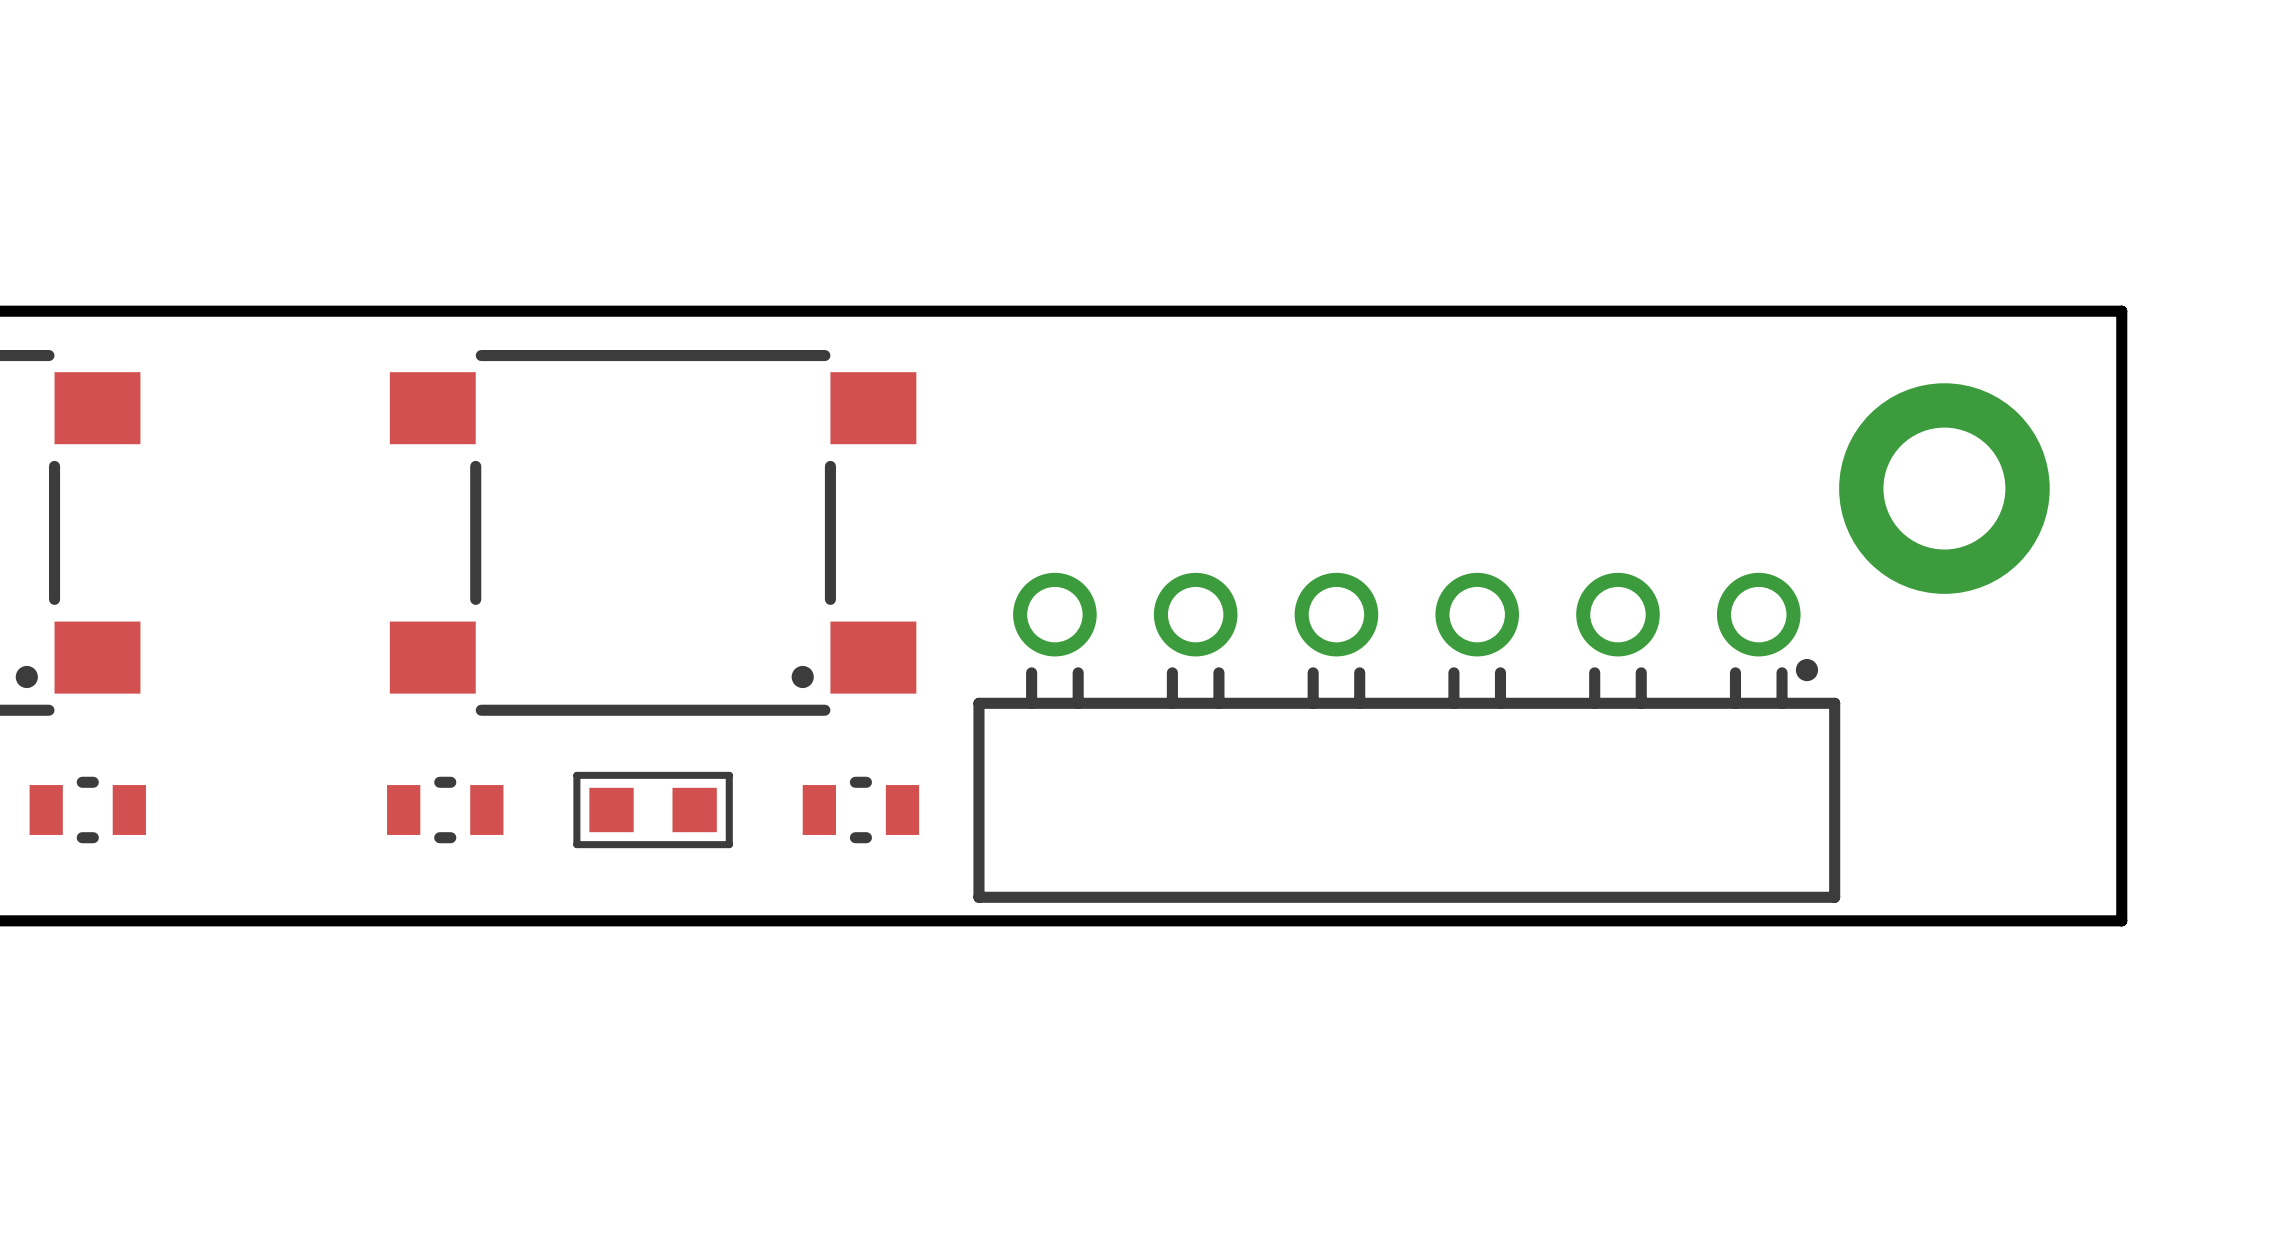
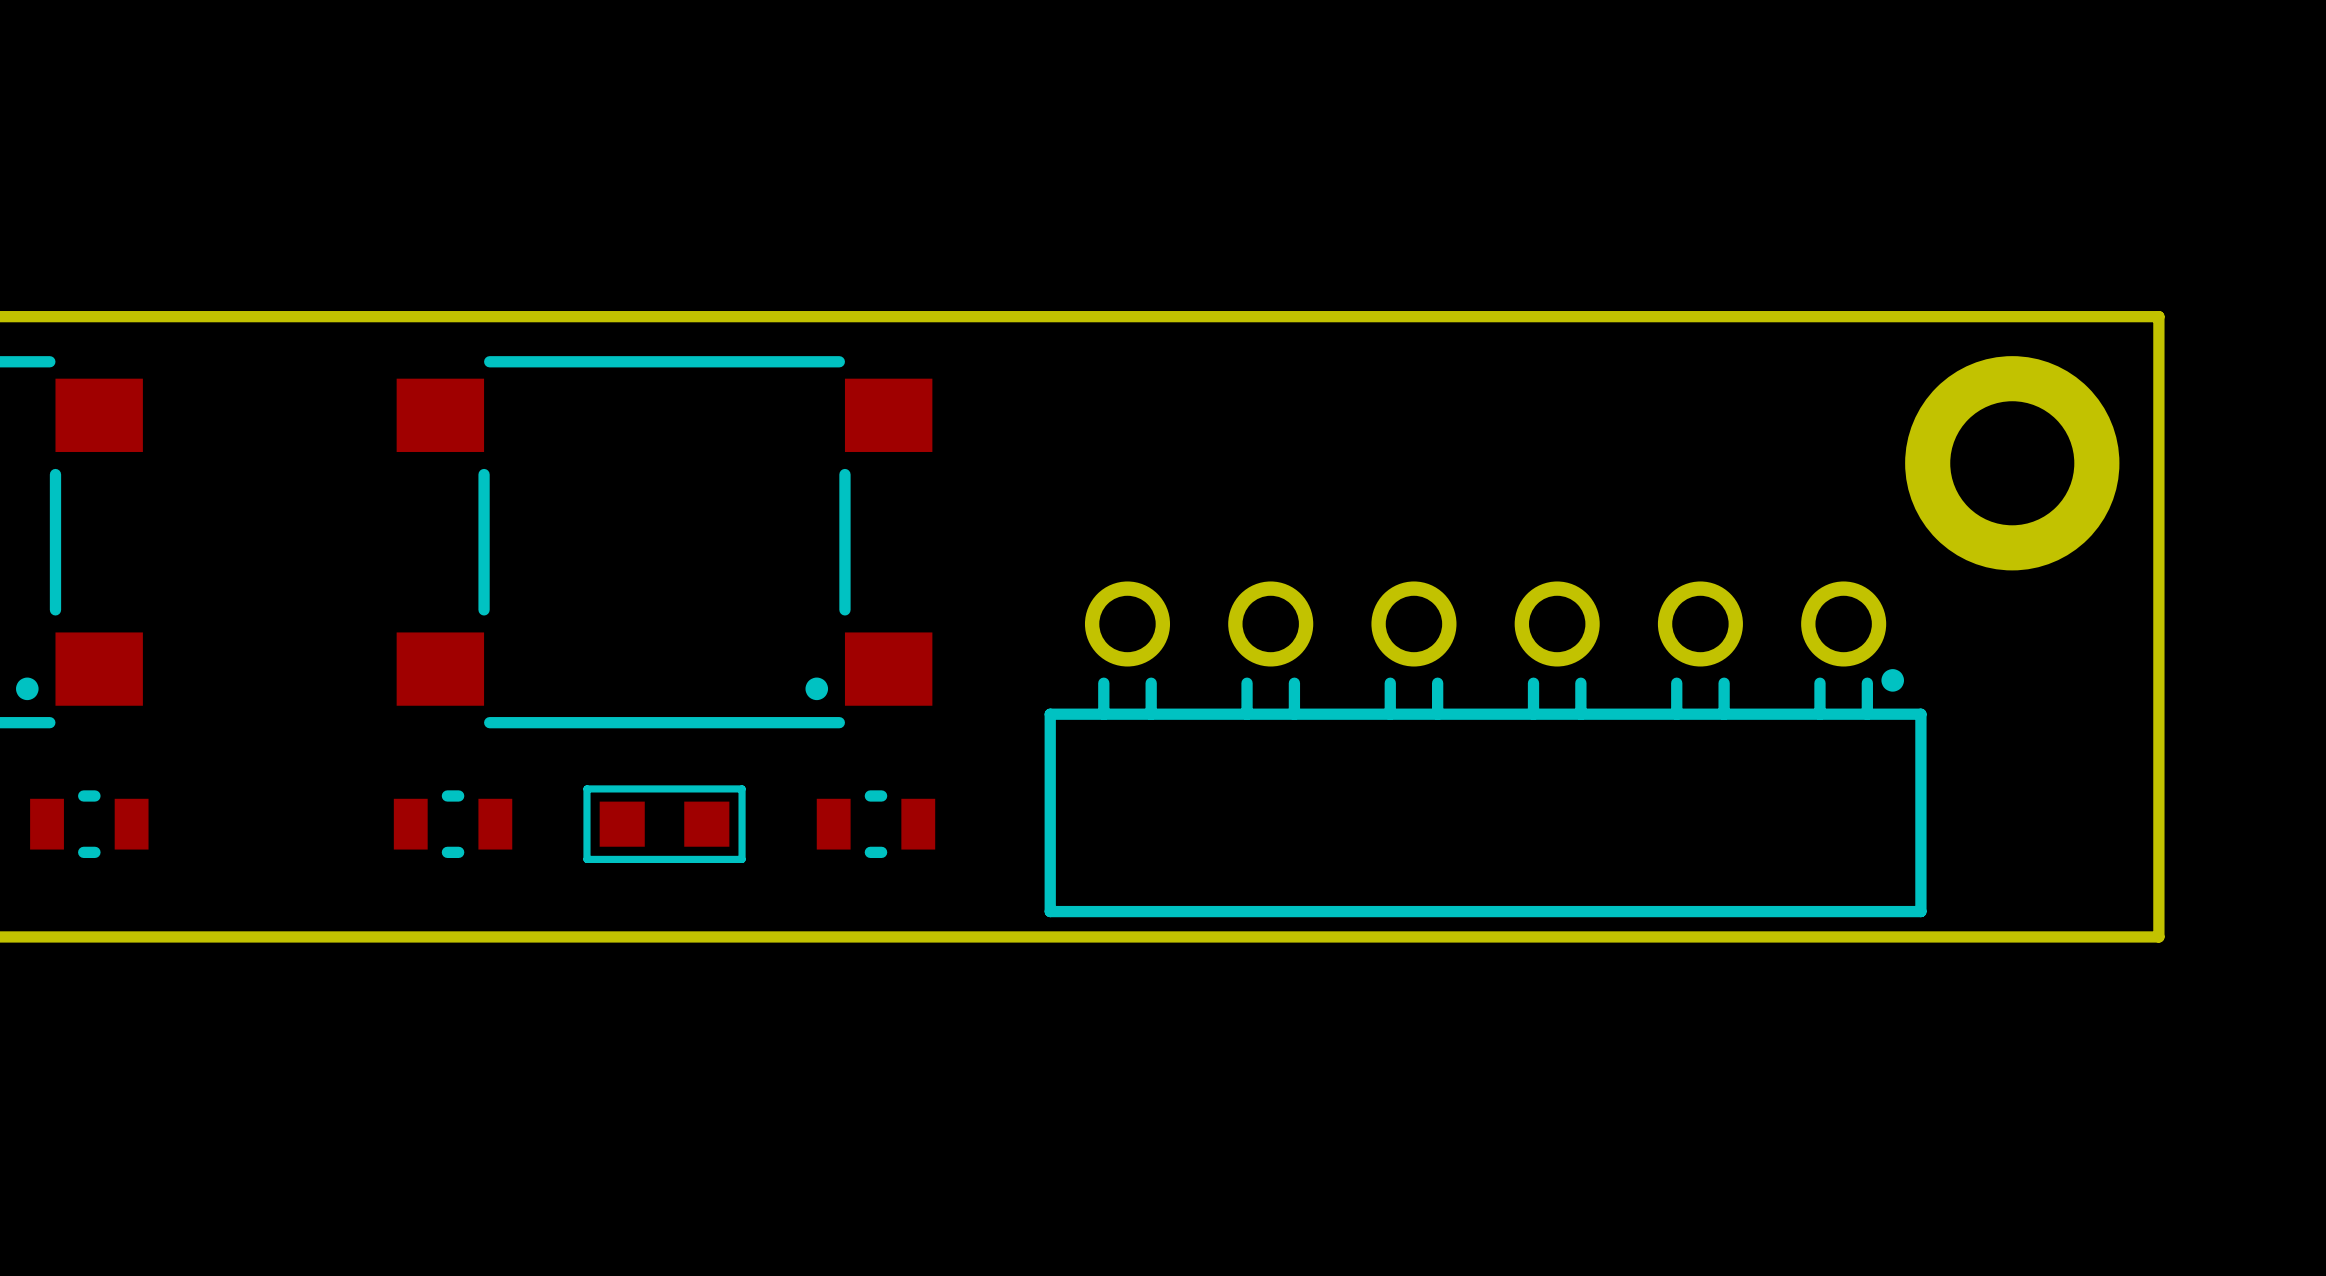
part position: (1944, 488) -> (2012, 463)
part position: (1406, 737) -> (1485, 749)

